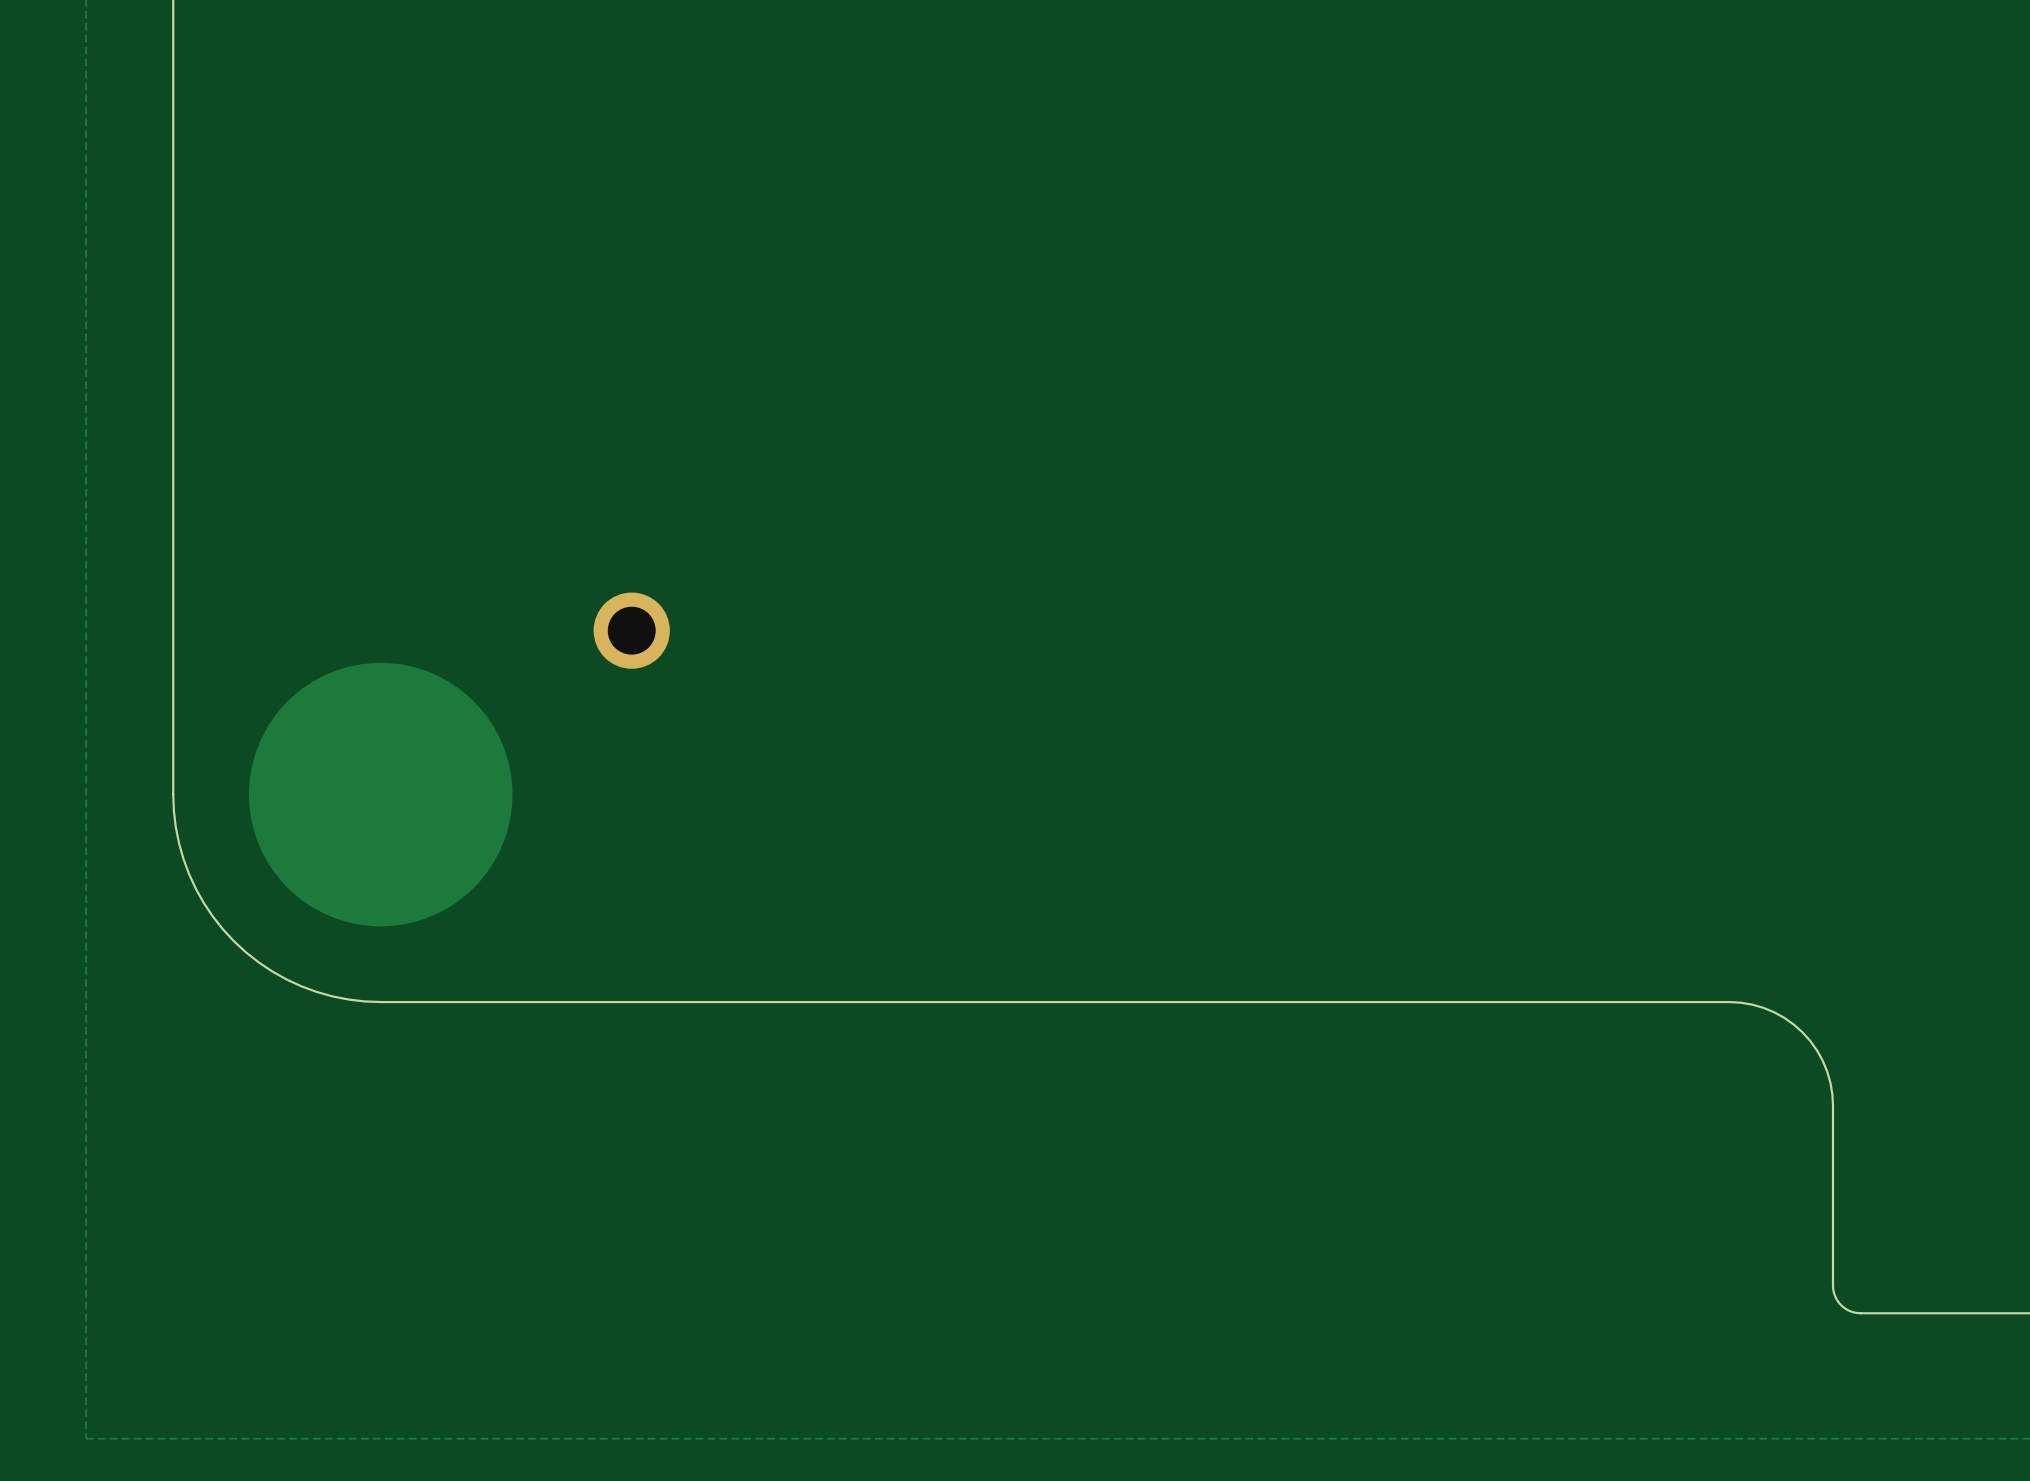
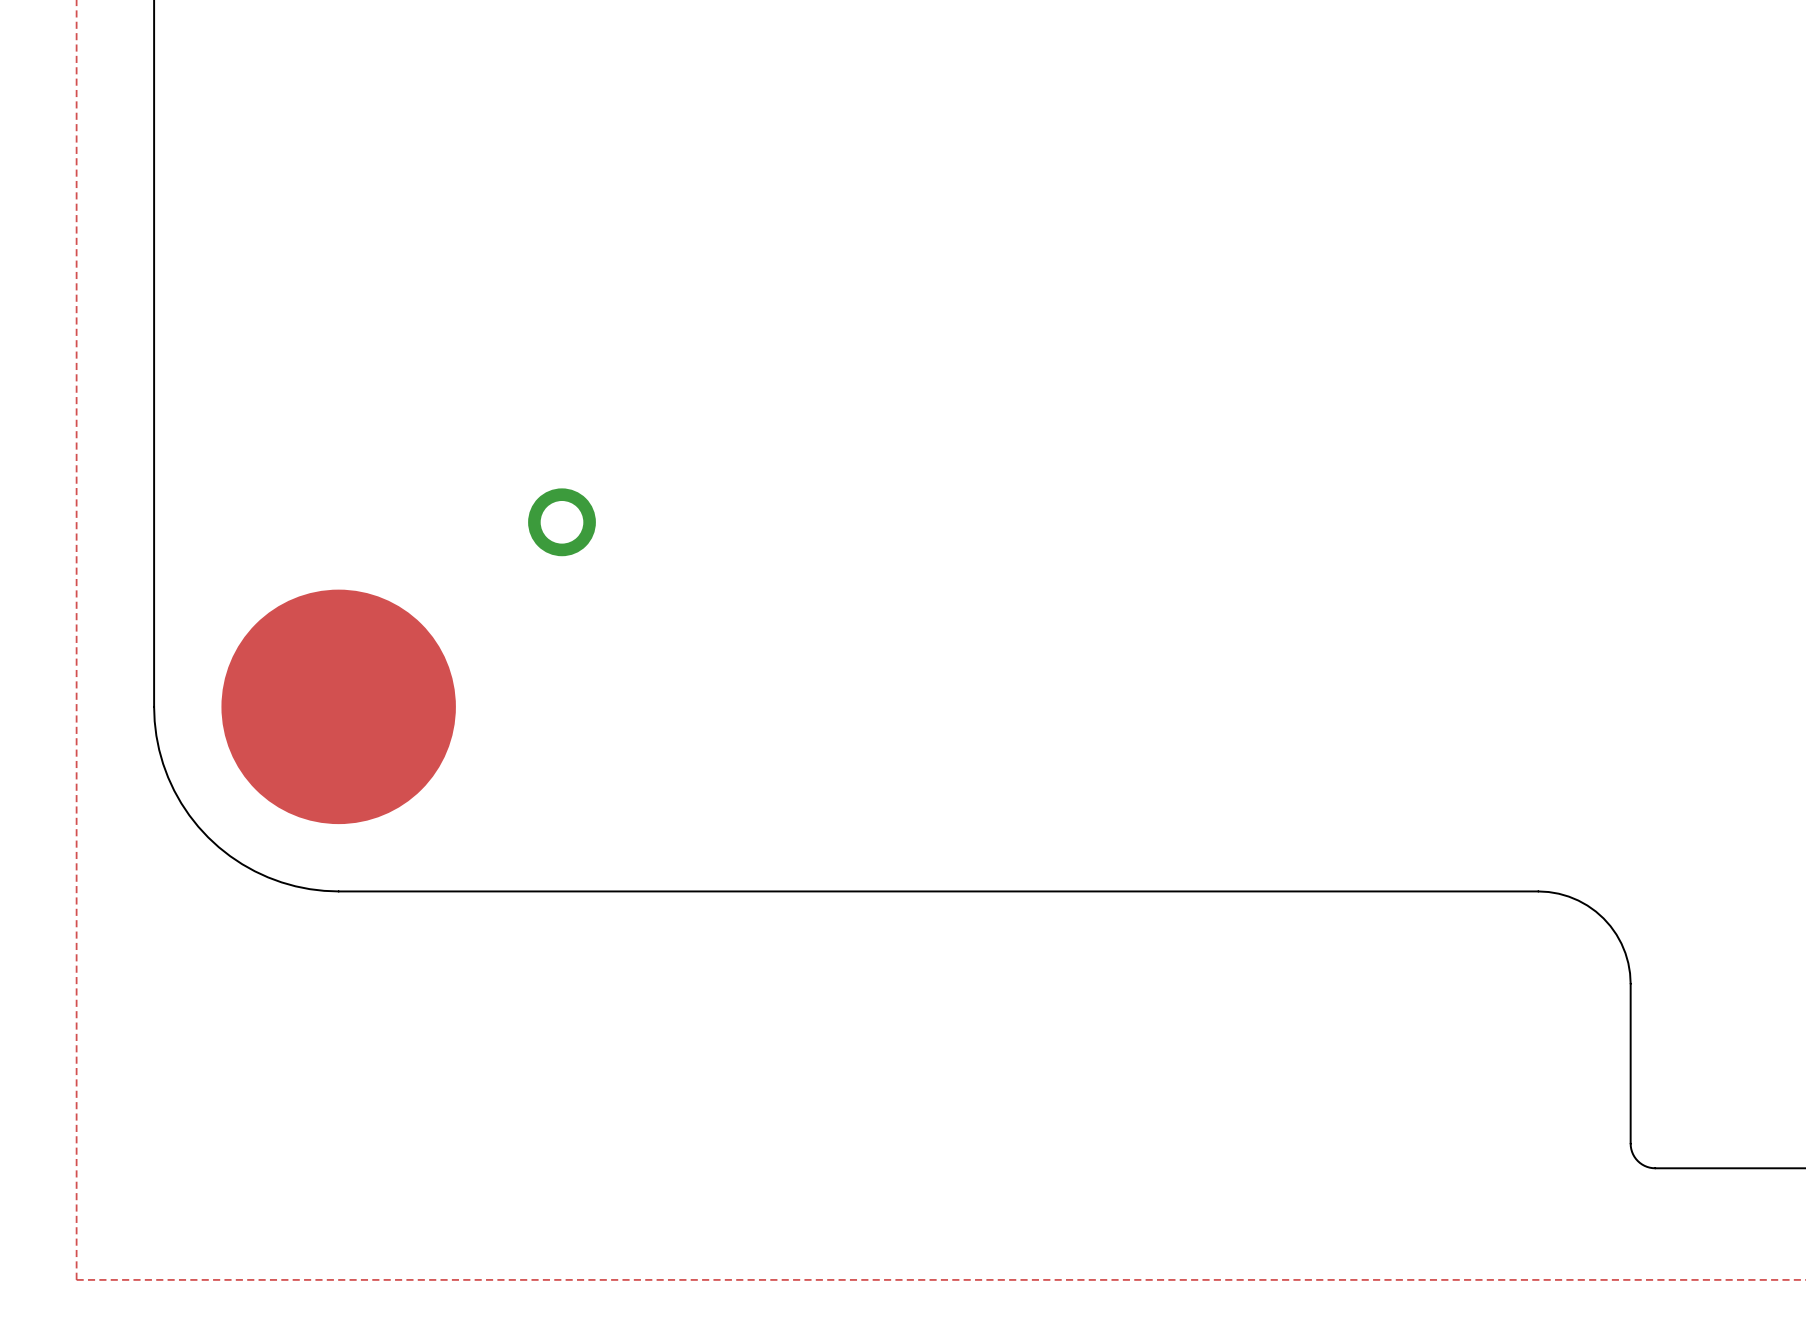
part position: (631, 630) -> (562, 522)

